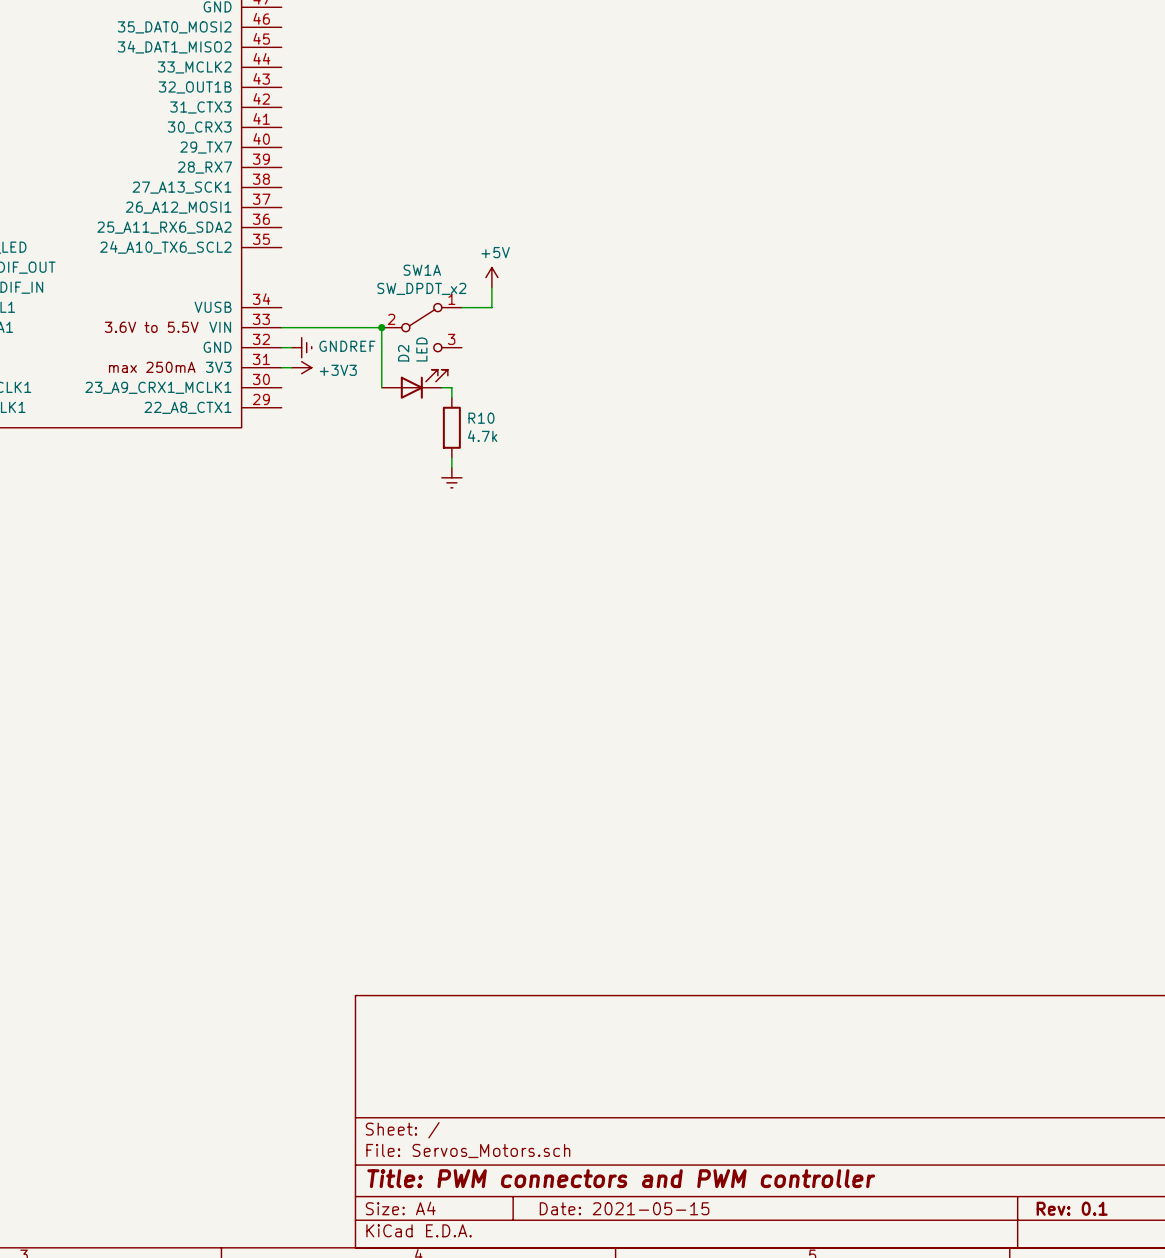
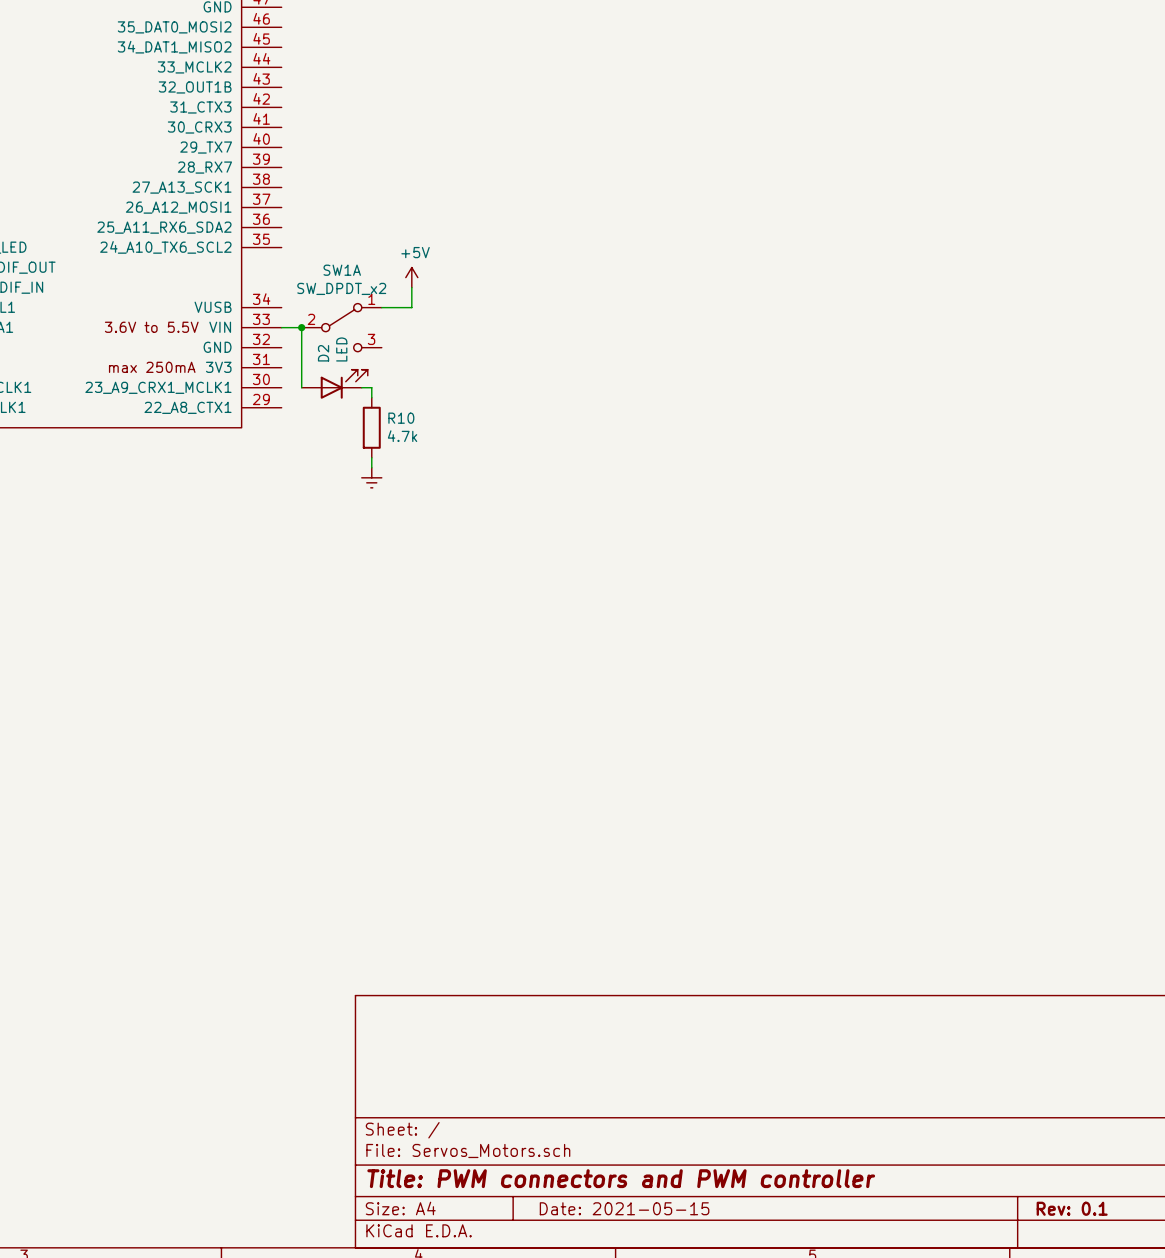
power symbol position: +5V (491, 277) -> +5V (411, 277)
wire: (491, 287) (491, 307) (461, 307) -> (411, 287) (411, 307) (381, 307)
wire: (301, 327) (381, 327) (381, 387) -> (301, 327) (301, 387)
junction: none -> (301, 327)
junction: (381, 327) -> none
SW1A position: (421, 327) -> (341, 327)
wire: (281, 347) (291, 347) -> none
power symbol: GNDREF (301, 347) -> none
wire: (281, 367) (291, 367) -> none
power symbol: +3V3 (301, 367) -> none
D2 position: (414, 384) -> (334, 384)
wire: (441, 387) (451, 387) (451, 397) -> (361, 387) (371, 387) (371, 397)
R10 position: (451, 427) -> (371, 427)
wire: (451, 457) (451, 467) -> (371, 457) (371, 467)
power symbol position: (451, 477) -> (371, 477)

